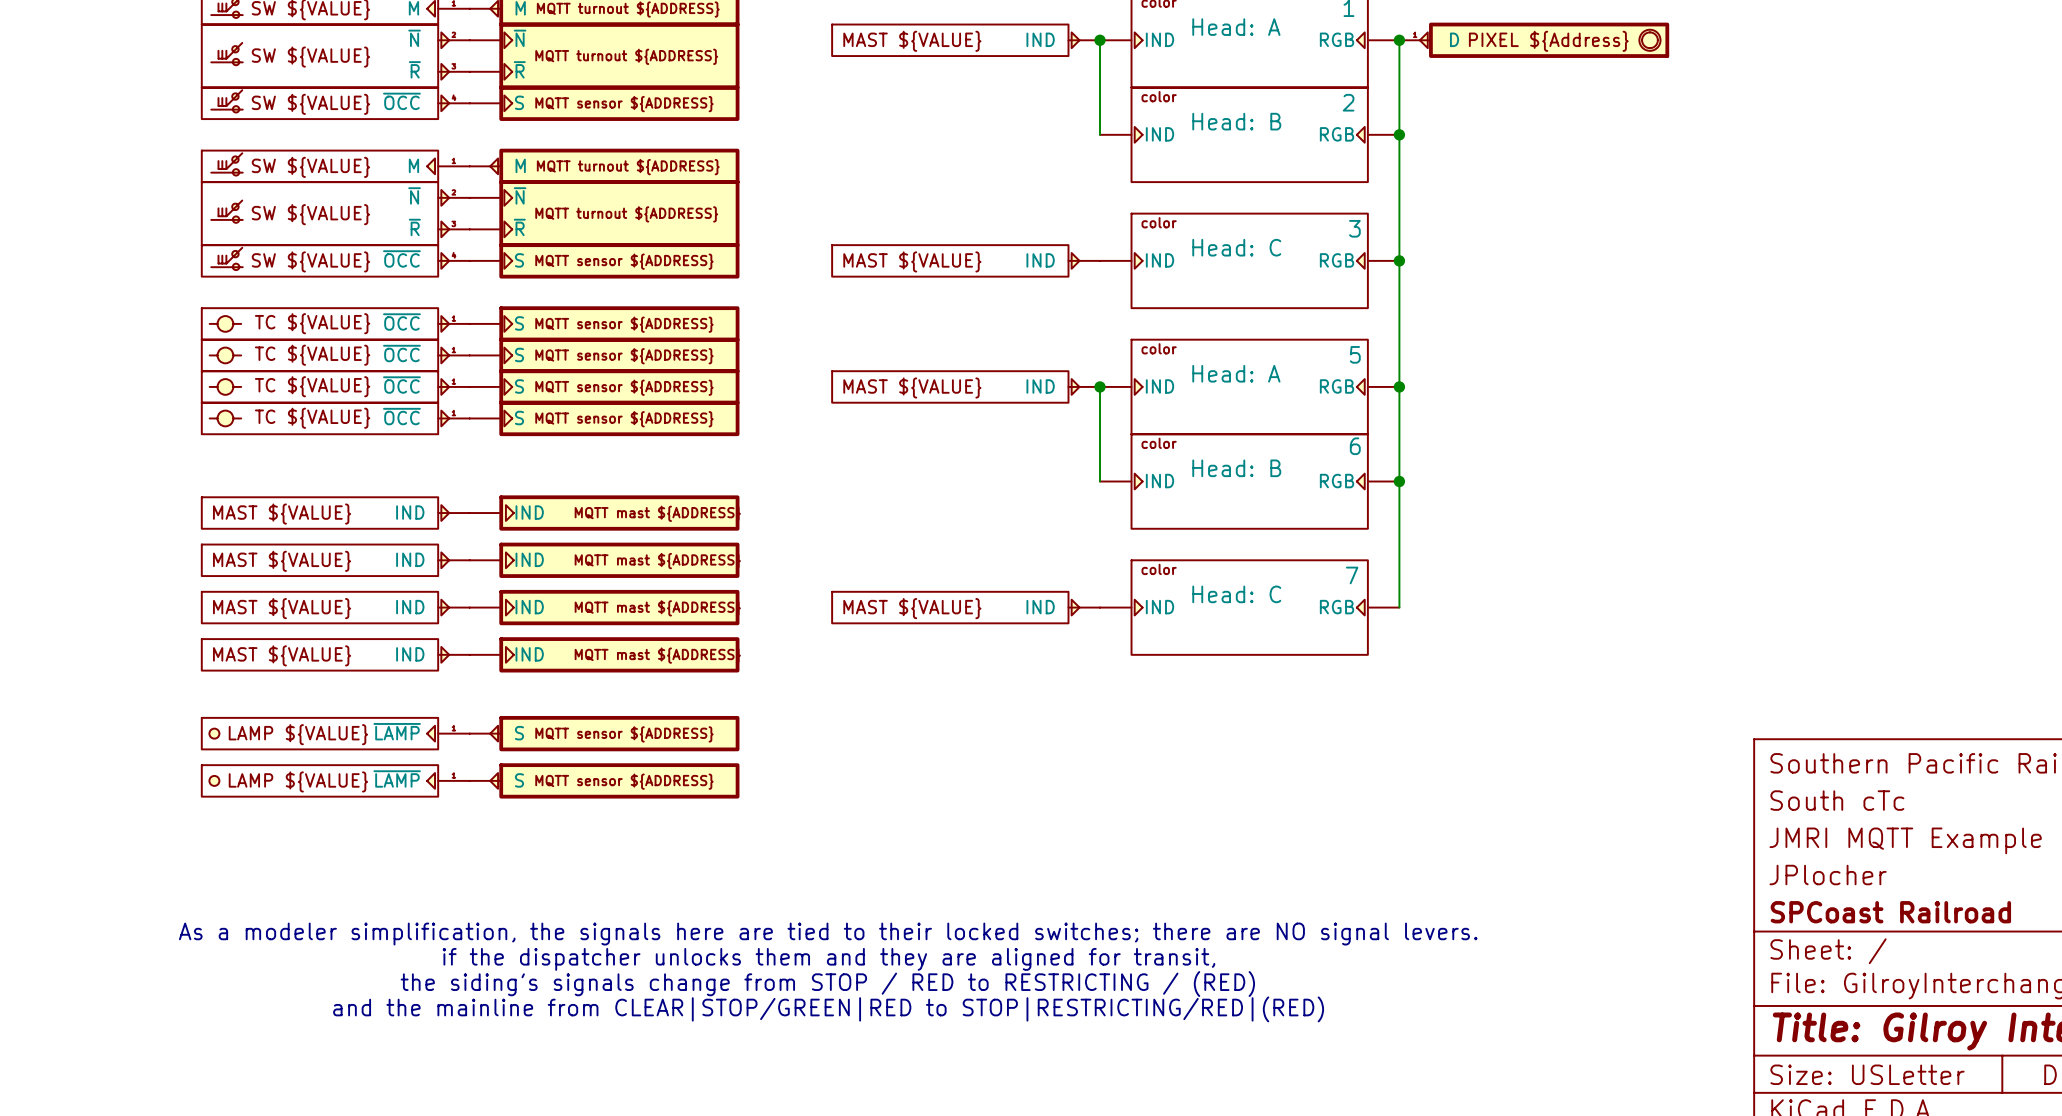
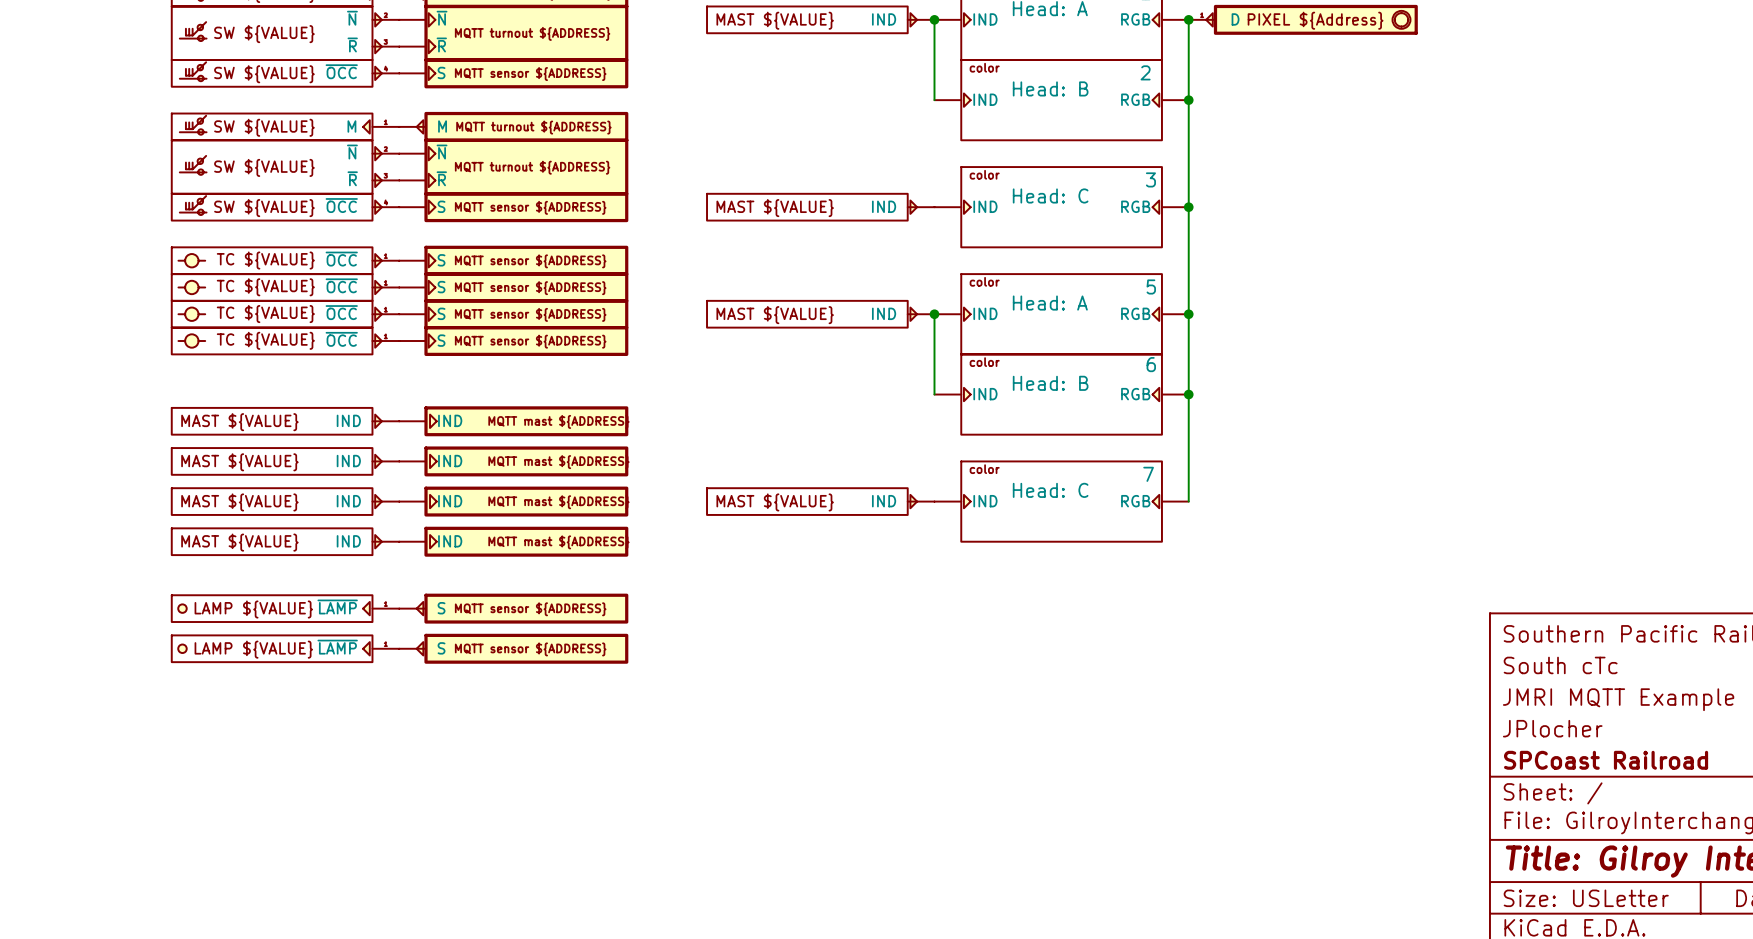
text: As a modeler simplification, the signals here are tied to their locked switches; there are NO signal levers. (828, 934) -> none
text: if the dispatcher unlocks them and they are aligned for transit, (828, 959) -> none
text: the siding's signals change from STOP / RED to RESTRICTING / (RED) (827, 984) -> none
text: and the mainline from CLEAR|STOP/GREEN|RED to STOP|RESTRICTING/RED|(RED) (828, 1009) -> none

